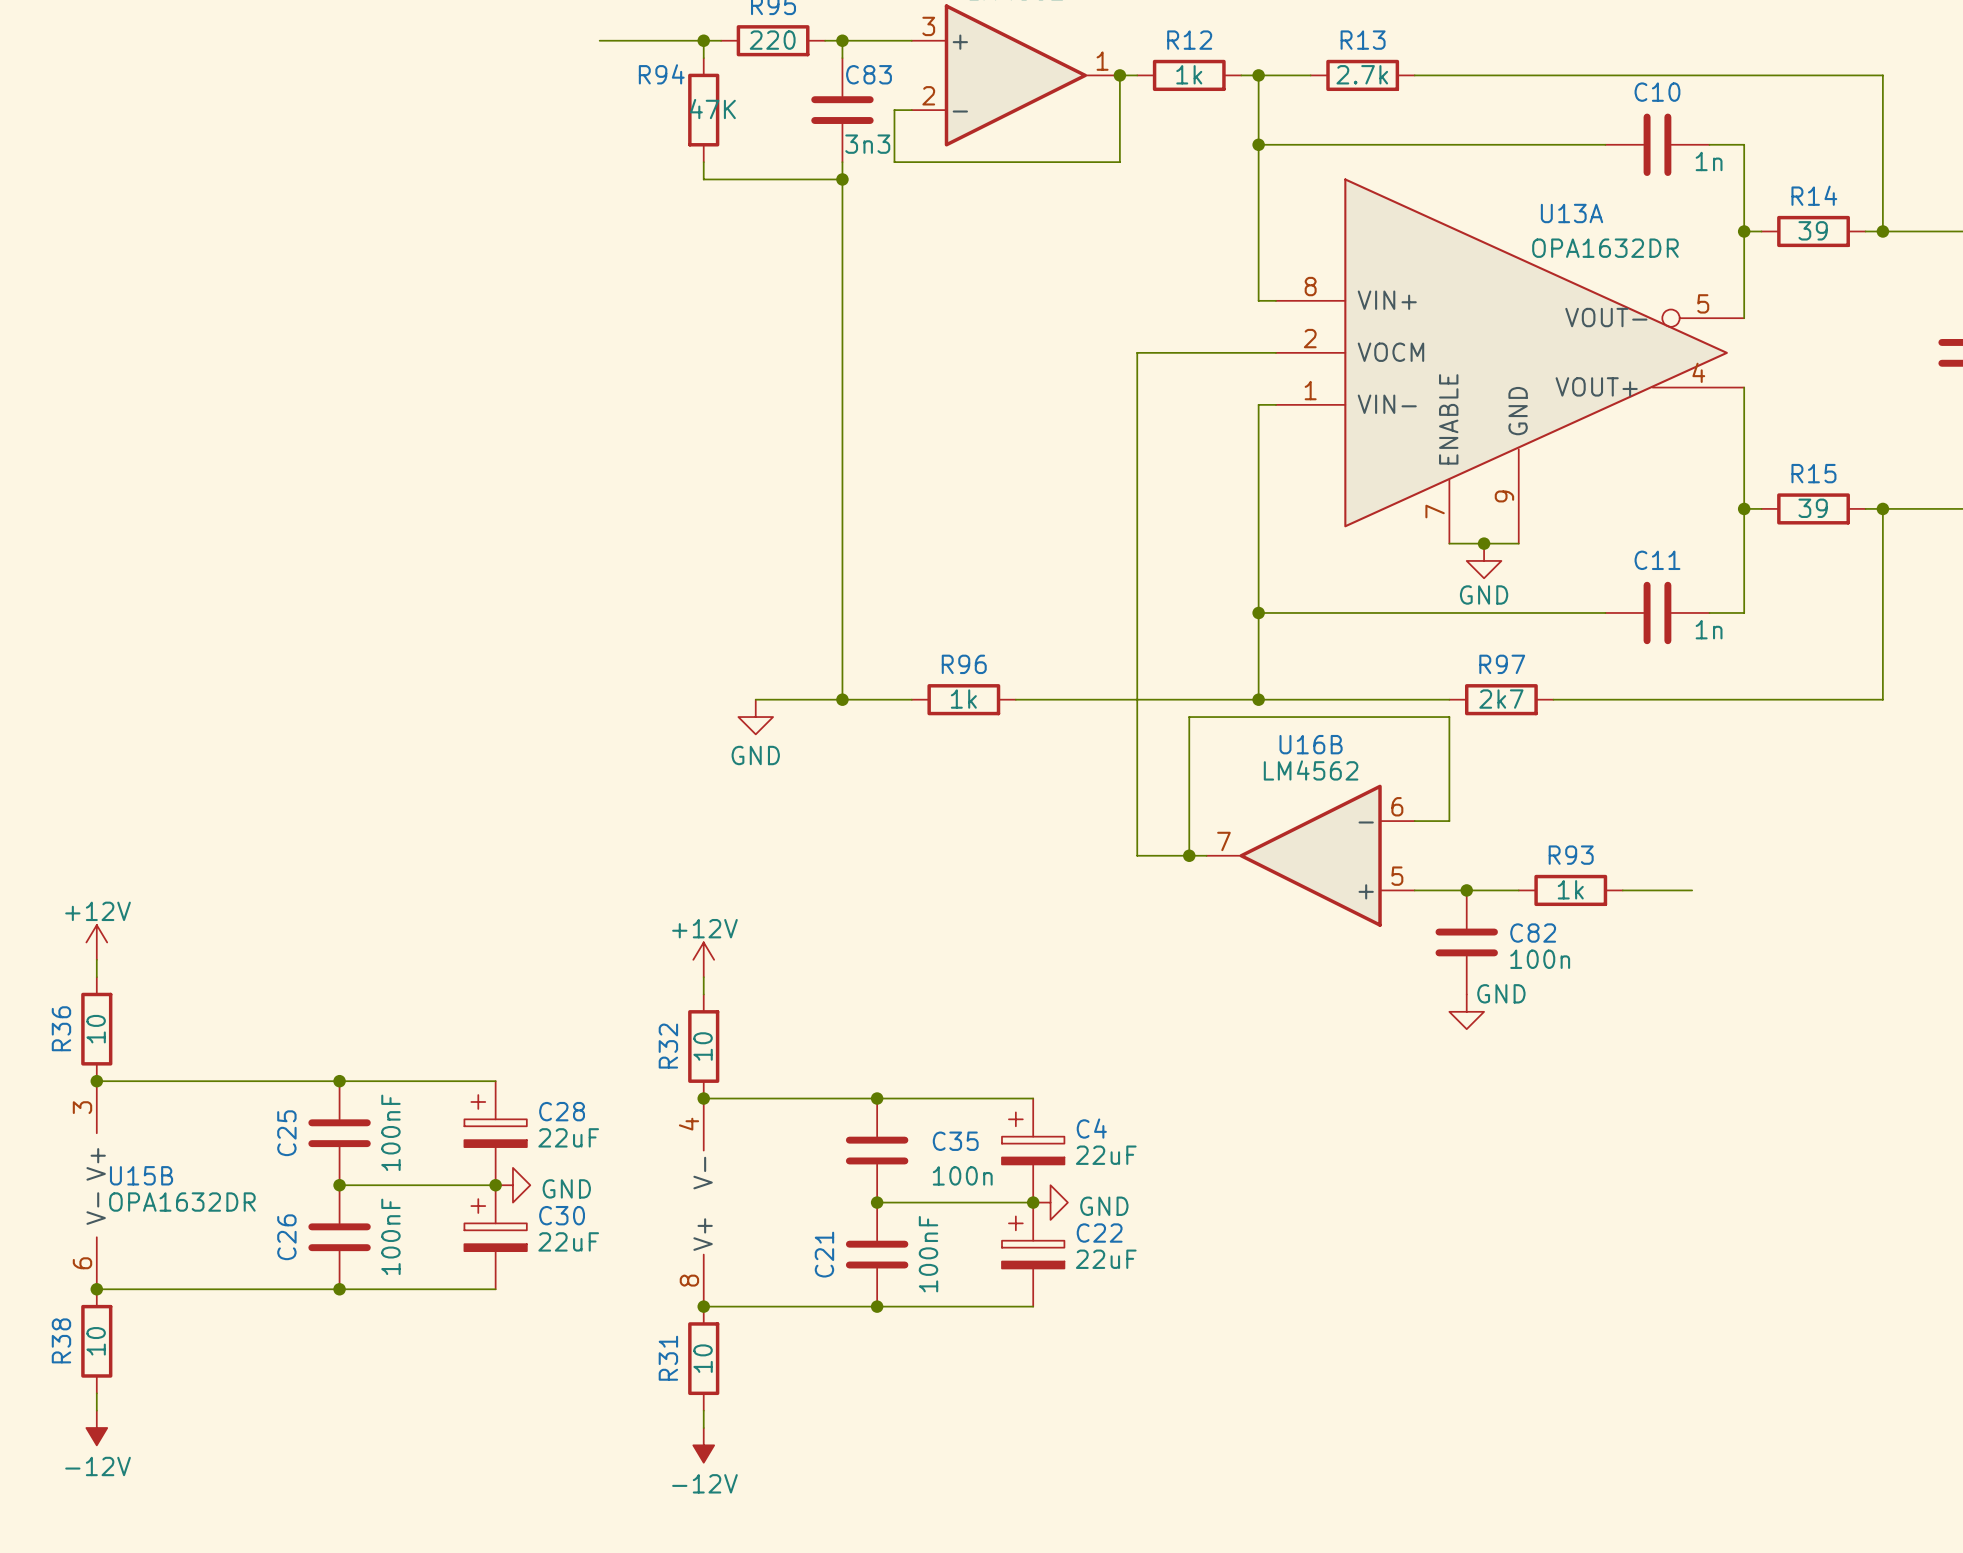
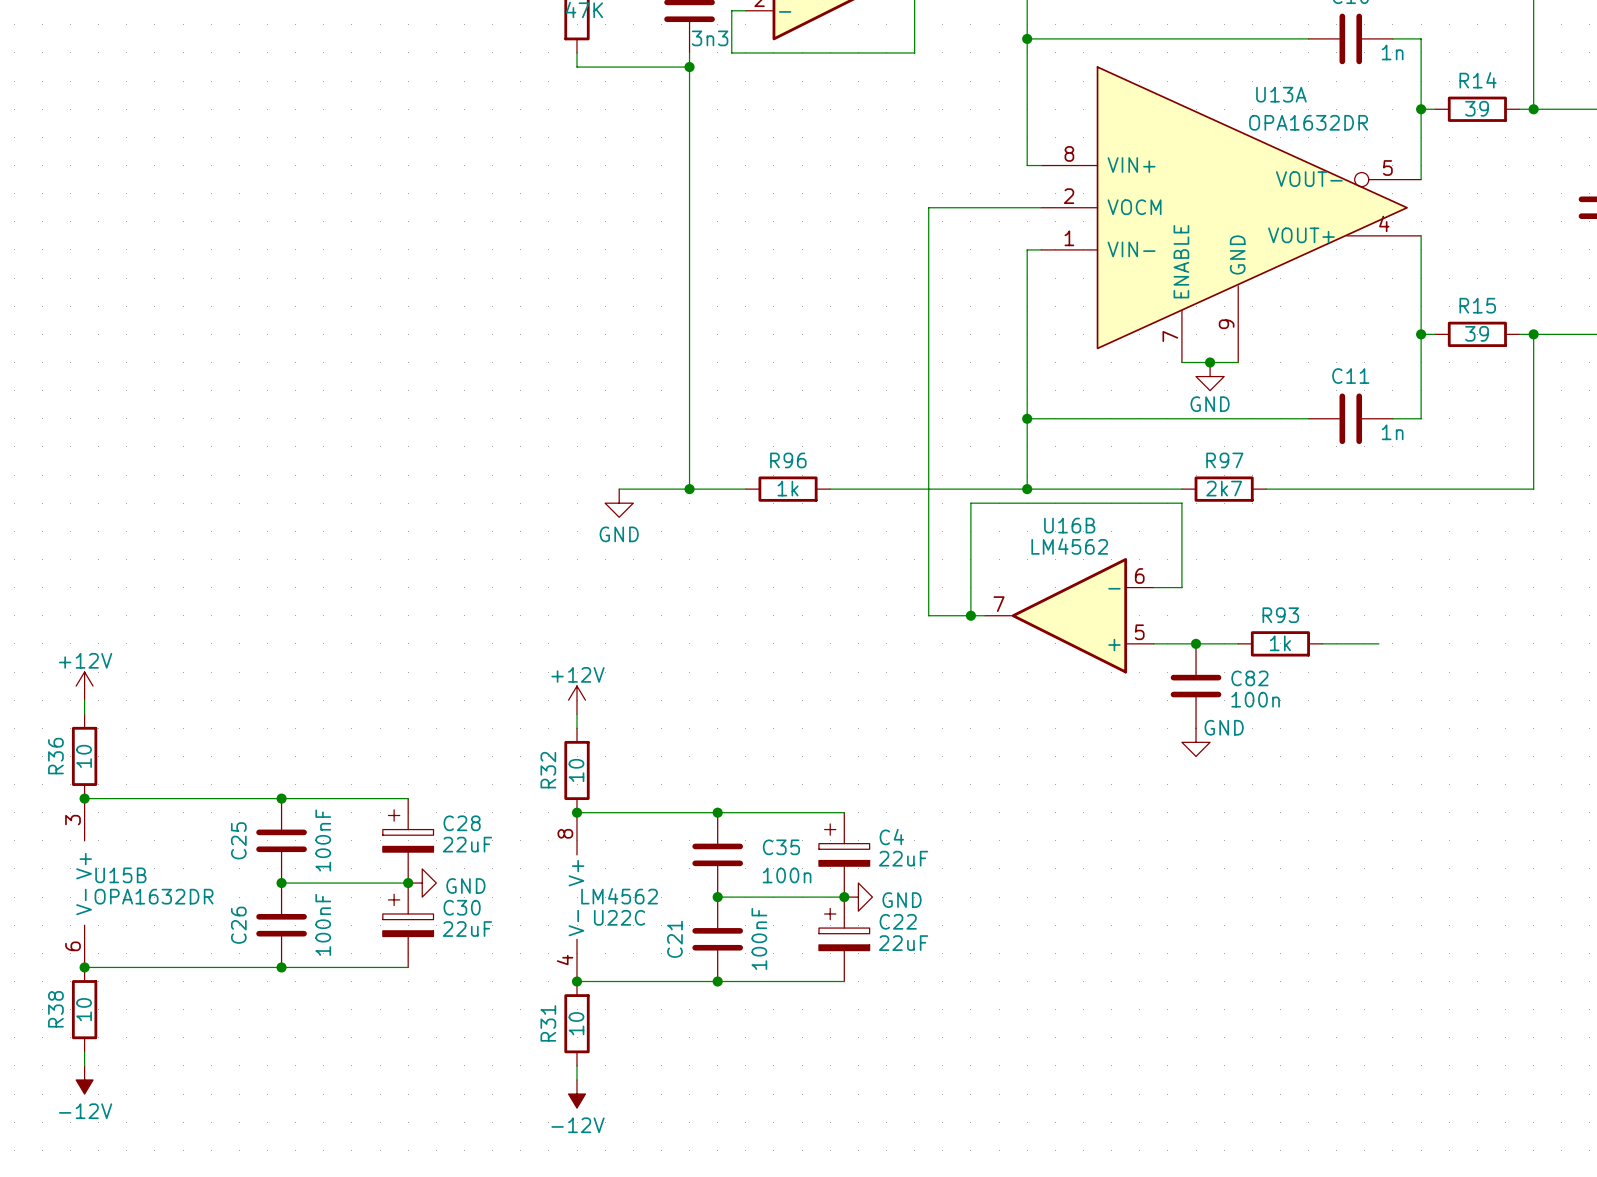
U22C value: none -> LM4562 (619, 896)
U22C rotation: 0° (703, 1202) -> 180° (577, 897)
U22C name: none -> U22C (619, 917)

